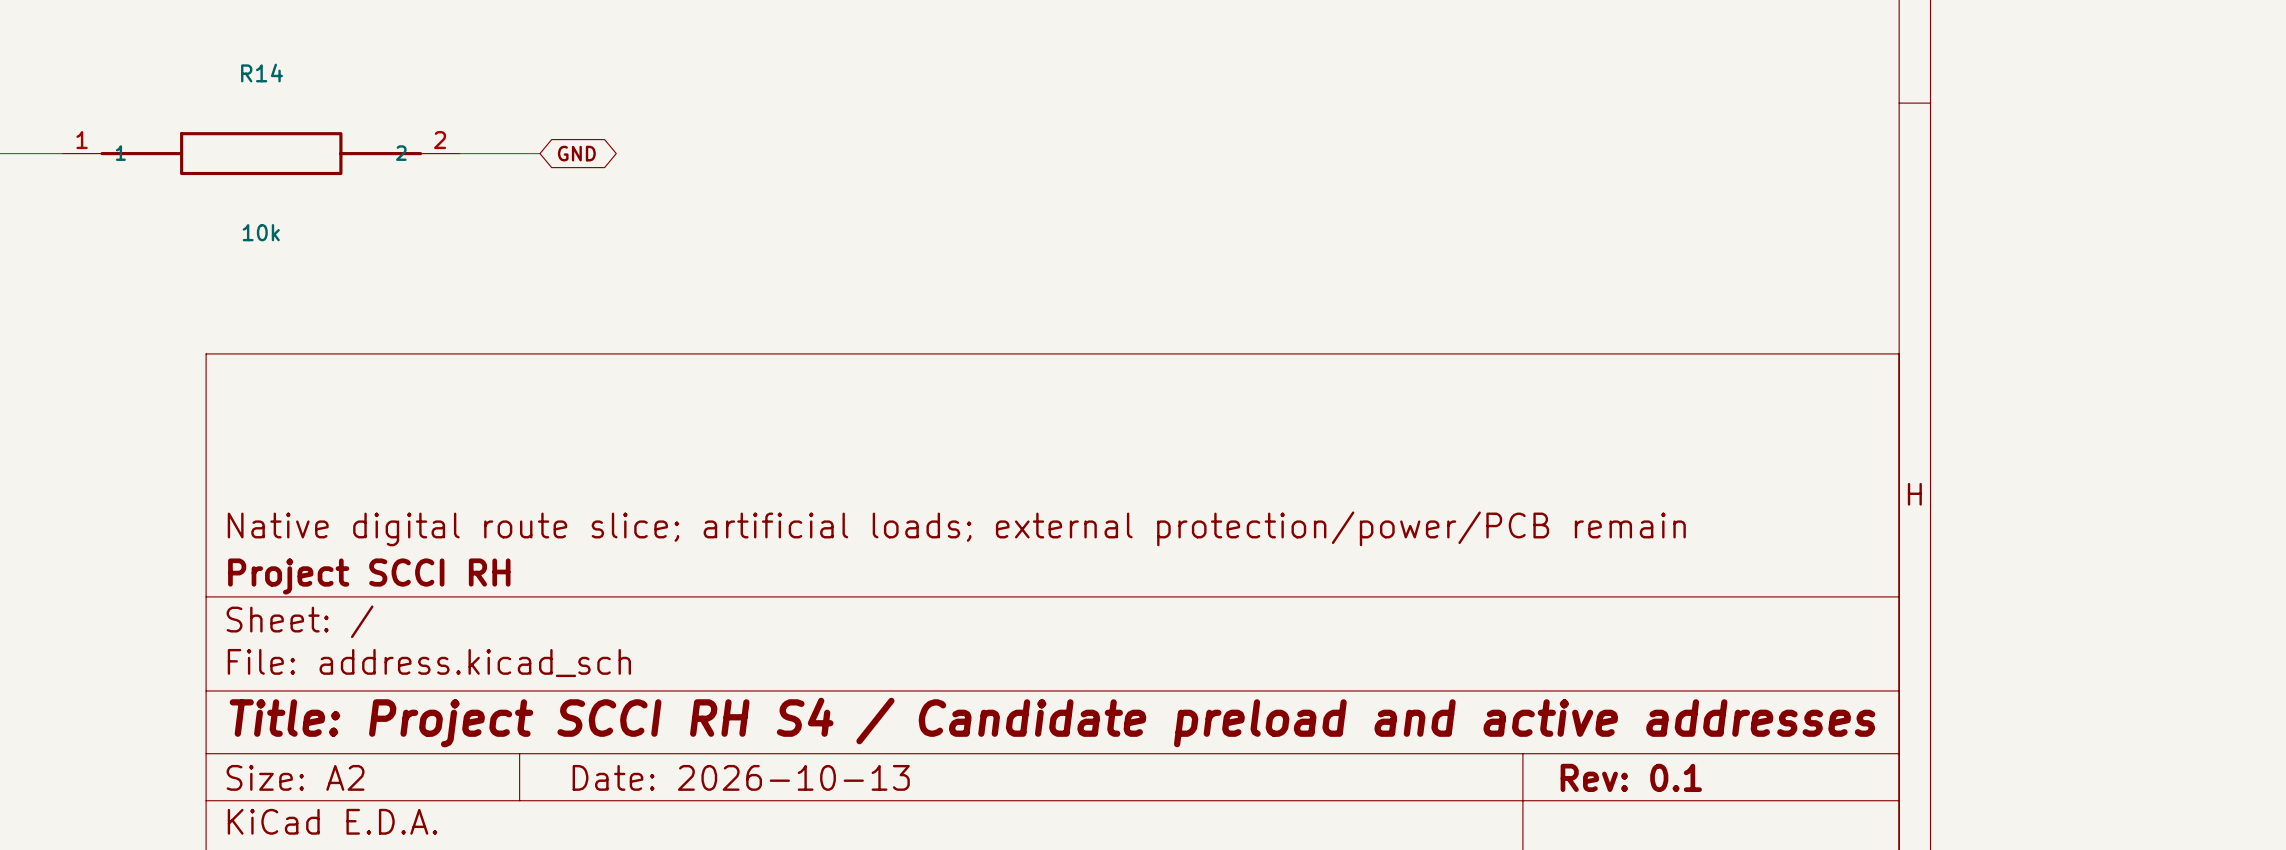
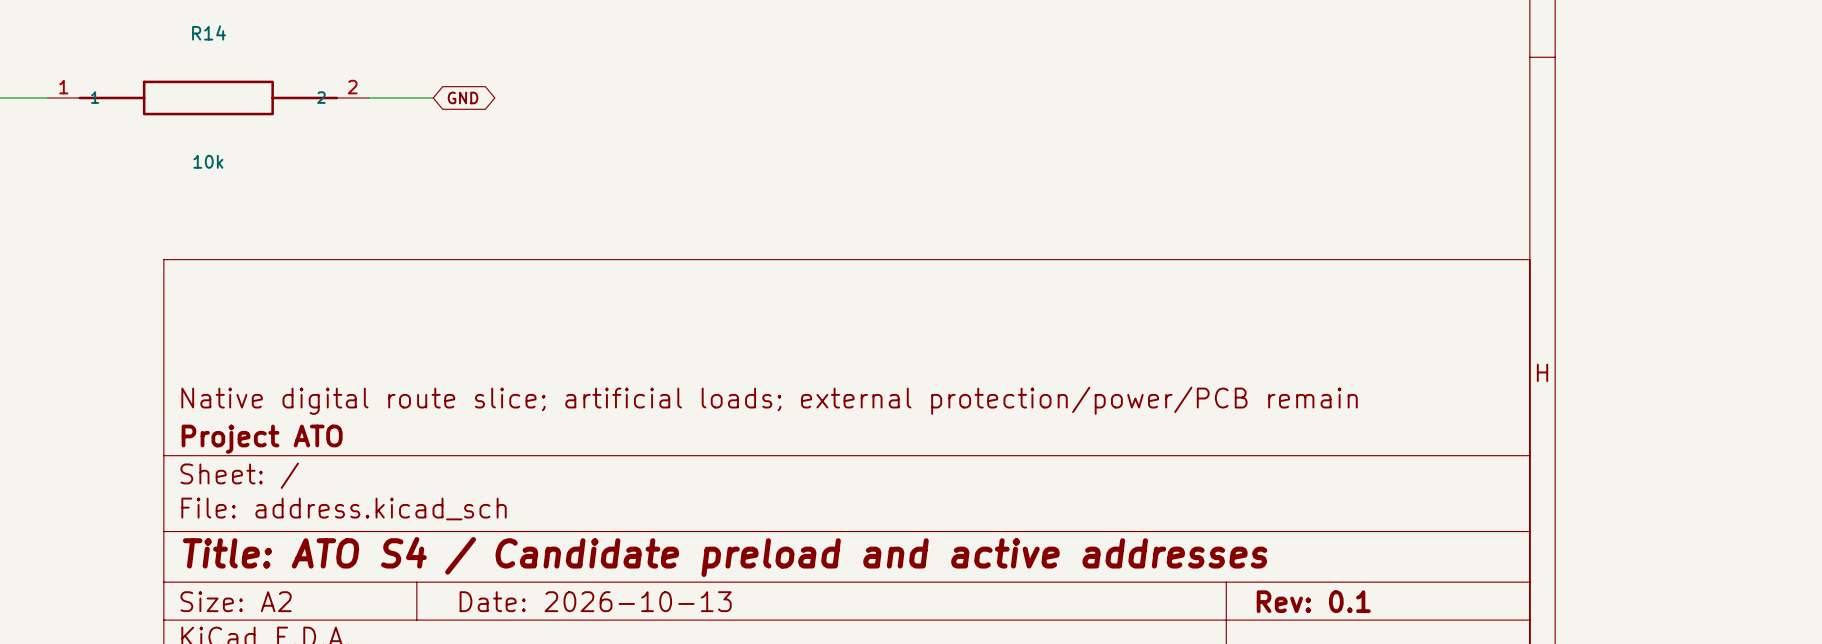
title block: Project SCCI RH (369, 576) -> Project ATO (262, 439)
title block: Title: Project SCCI RH S4 / Candidate preload and active addresses (1052, 722) -> Title: ATO S4 / Candidate preload and active addresses (725, 556)

